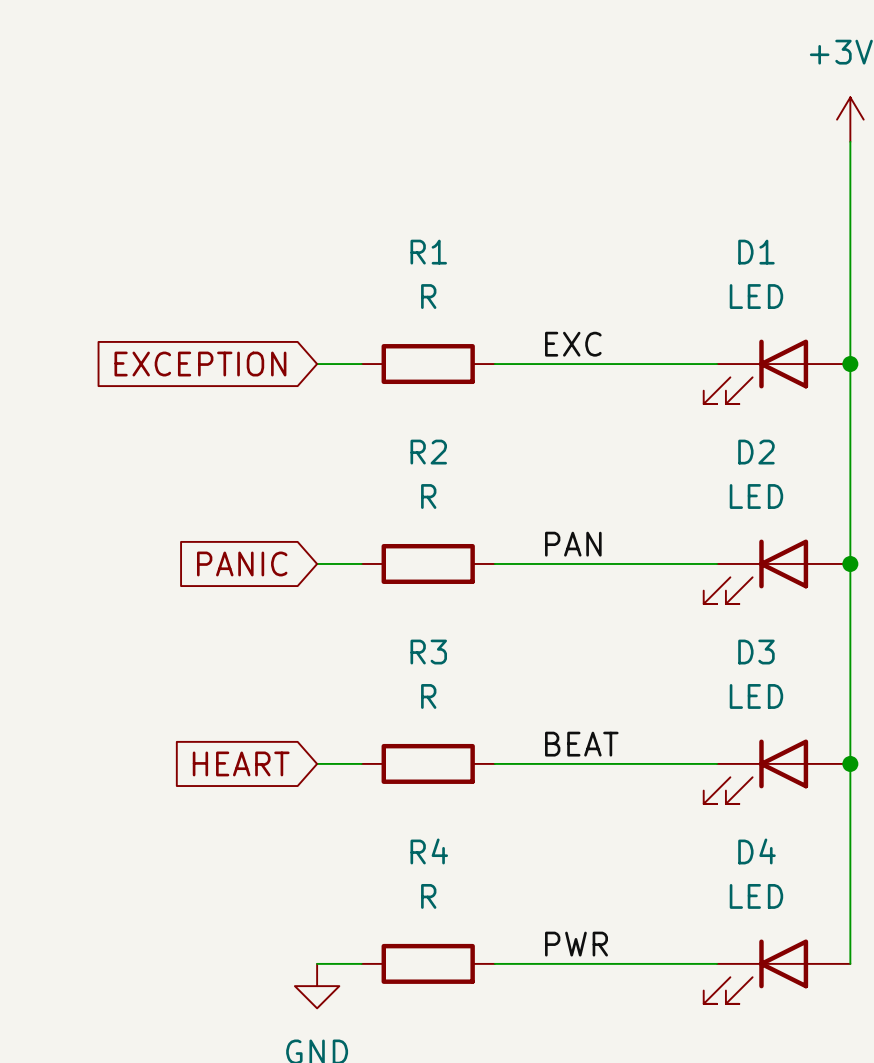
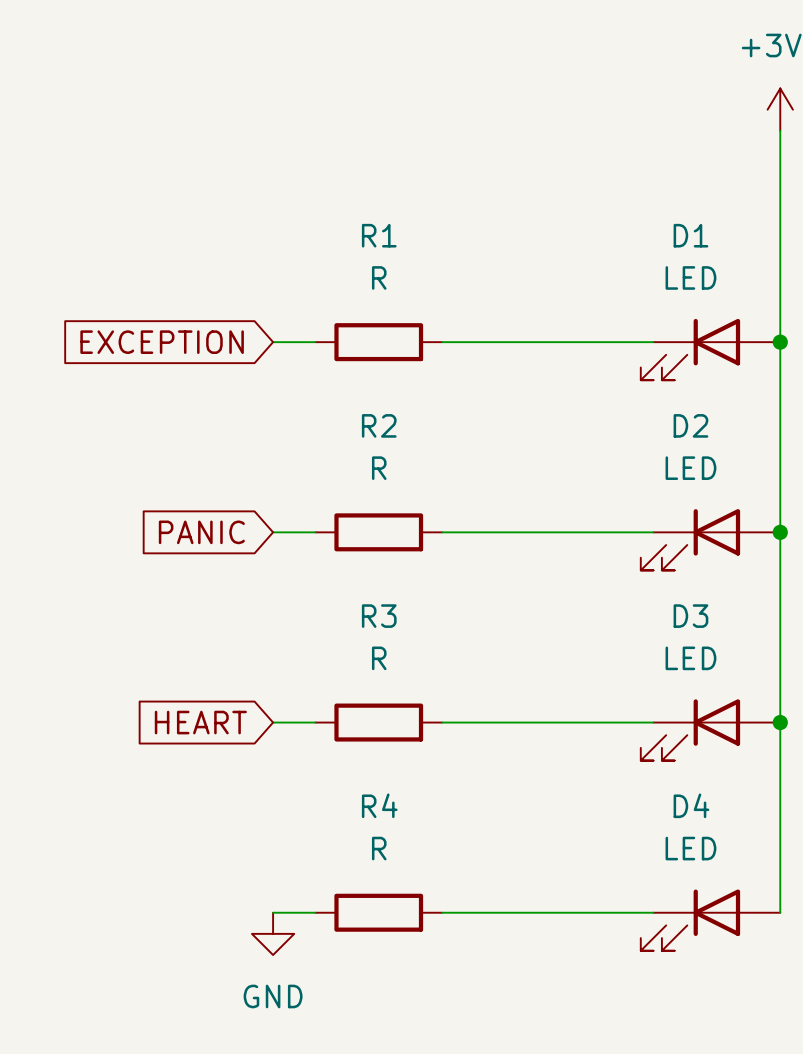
label: EXC (573, 344) -> none
label: PAN (573, 544) -> none
label: BEAT (581, 744) -> none
label: PWR (576, 944) -> none

